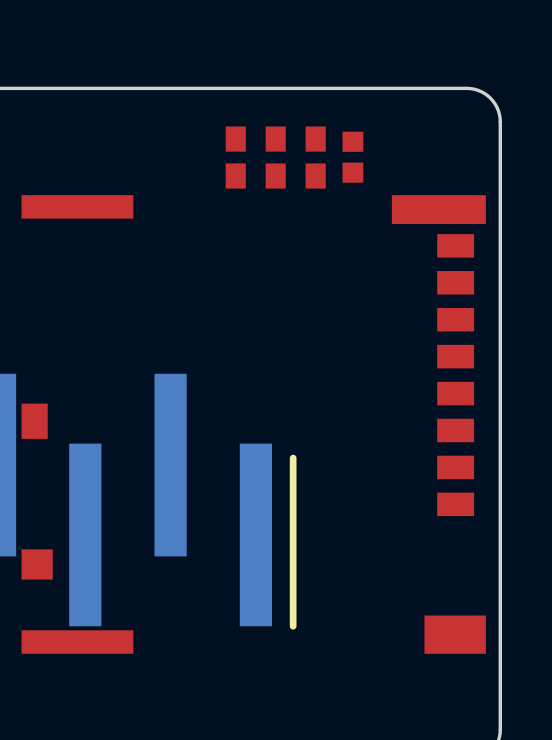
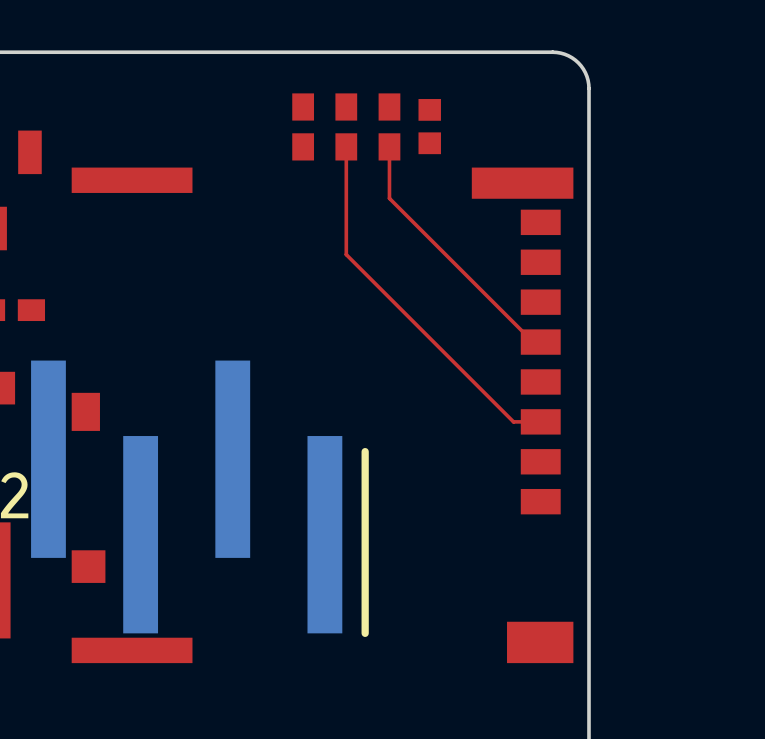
top track: none -> (346, 146) (346, 254) (513, 421) (540, 421)
top track: none -> (389, 146) (389, 198) (533, 342) (540, 342)

